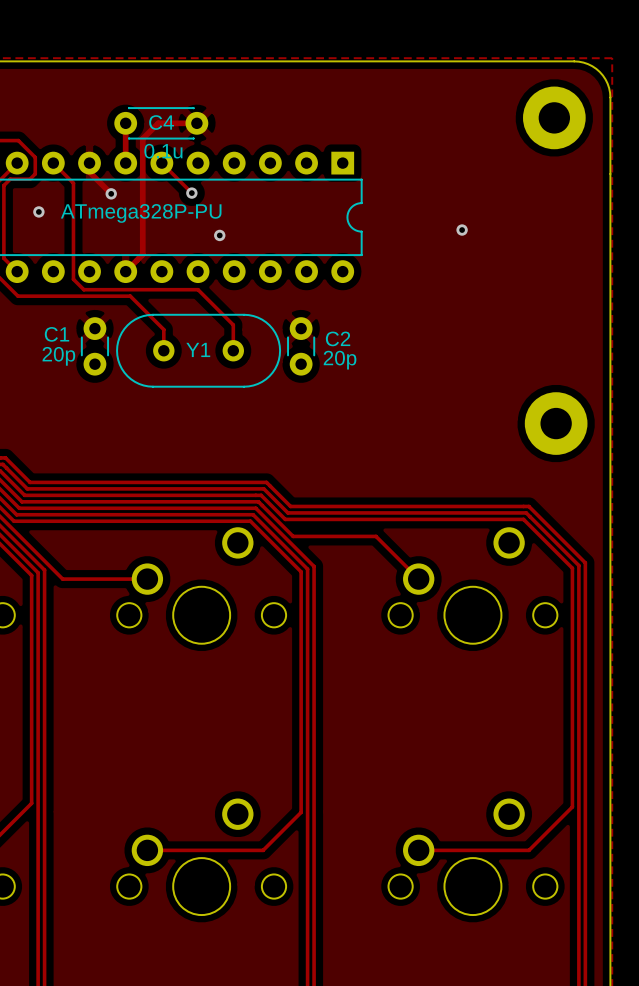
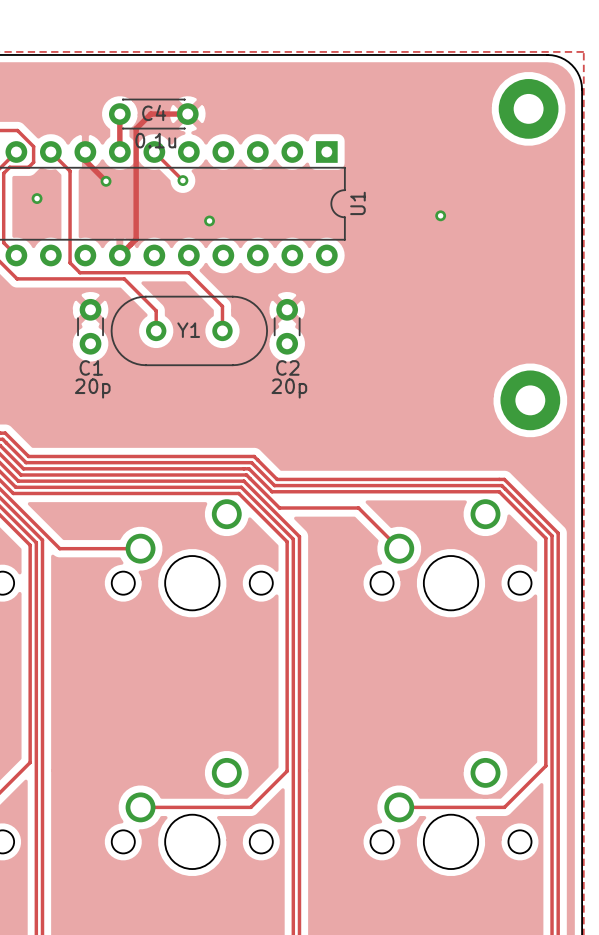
ATmega328P-PU name: ATmega328P-PU (141, 213) -> U1 (357, 203)
C1 name position: C1 (56, 334) -> C1 (91, 367)
C2 name position: C2 (338, 338) -> C2 (287, 367)
C1 value position: 20p (58, 356) -> 20p (92, 388)
C2 value position: 20p (340, 360) -> 20p (289, 388)

